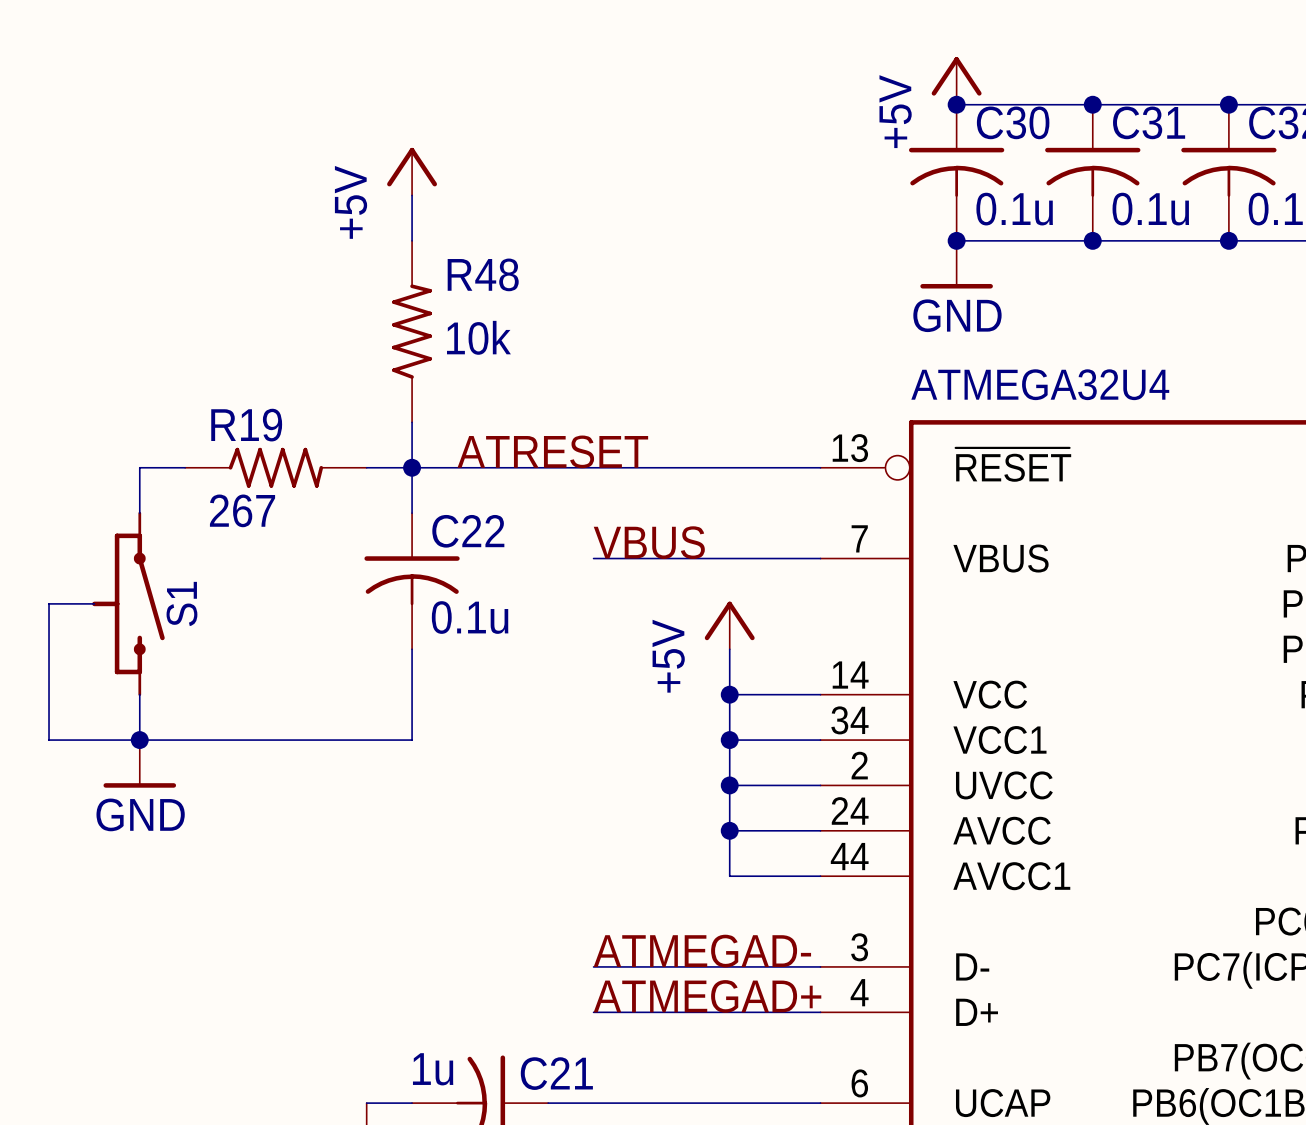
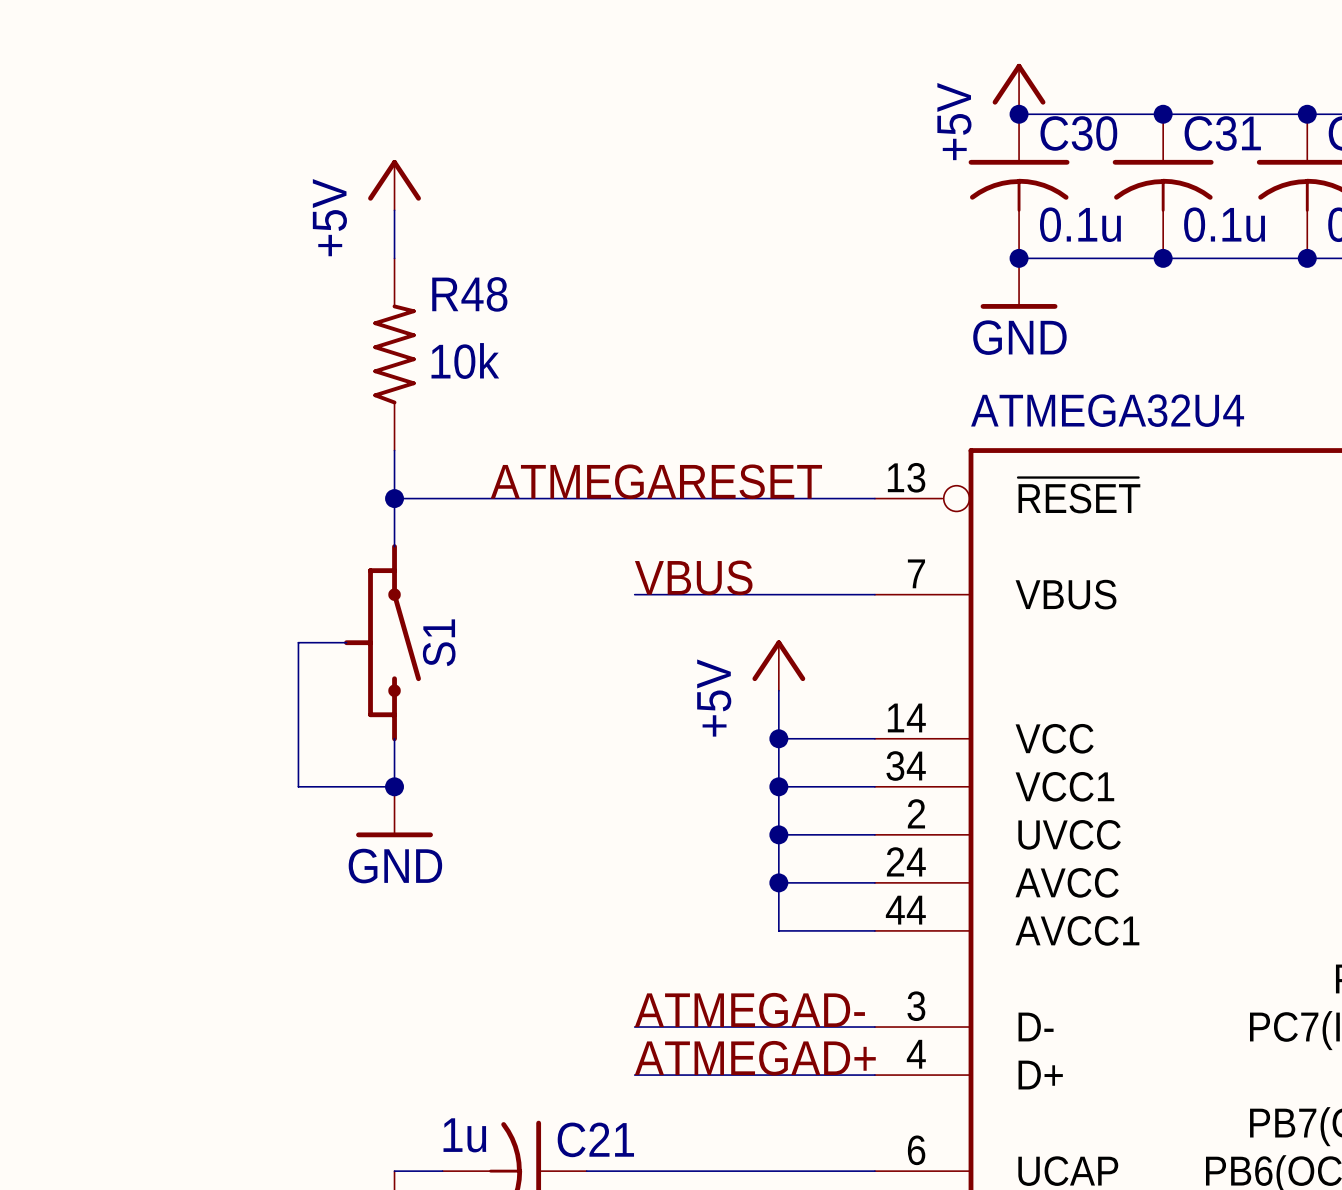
power symbol position: +5V (412, 171) -> +5V (394, 185)
wire: (412, 195) (412, 240) -> (394, 210) (394, 258)
R48 position: (412, 331) -> (394, 354)
wire: (412, 422) (412, 513) -> (394, 450) (394, 546)
label: ATRESET (552, 451) -> ATMEGARESET (656, 481)
wire: (185, 467) (139, 467) (139, 513) -> none
R19: 267 (275, 467) -> none
junction position: (412, 467) -> (394, 498)
S1 symbol: [92, 511, 165, 697] -> [344, 544, 421, 742]
C22: 0.1u (412, 581) -> none
wire: (94, 603) (49, 603) (49, 740) (275, 740) -> (346, 642) (298, 642) (298, 786)
wire: (412, 649) (412, 740) (366, 740) -> (394, 738) (394, 786)
wire: (139, 694) (139, 740) -> none
junction: (139, 740) -> none
junction: none -> (394, 786)
power symbol position: GND (139, 763) -> GND (394, 812)

